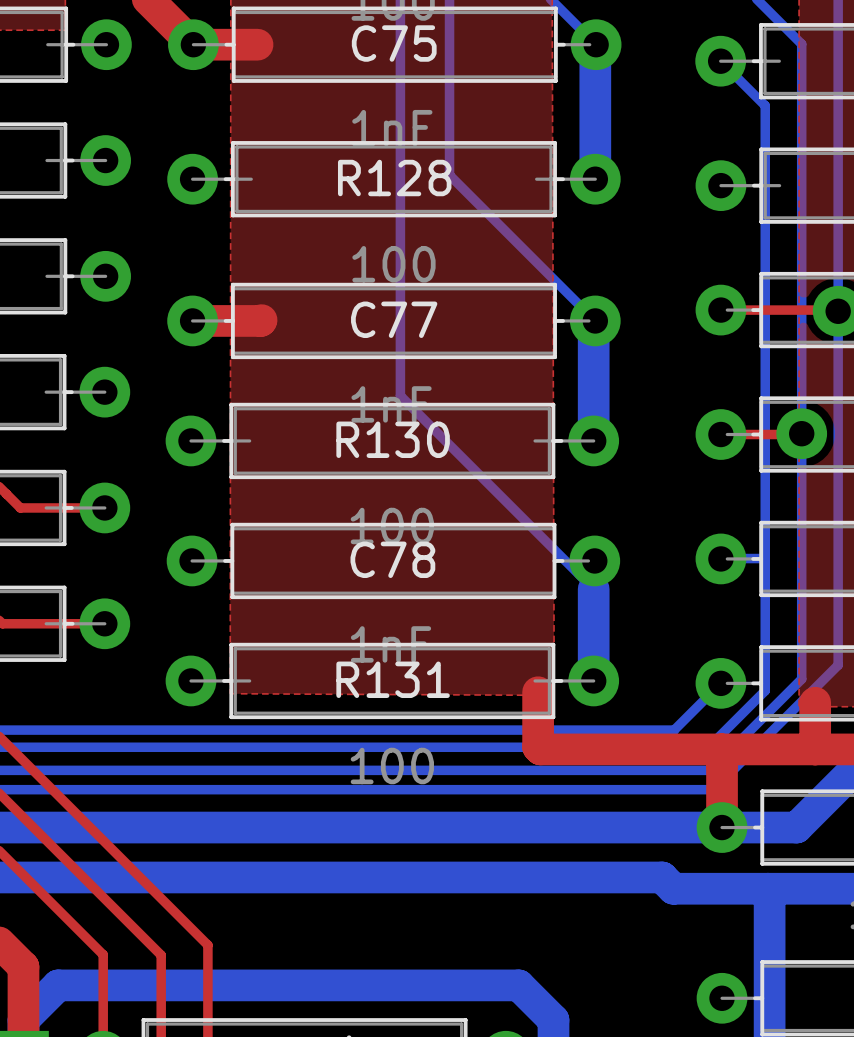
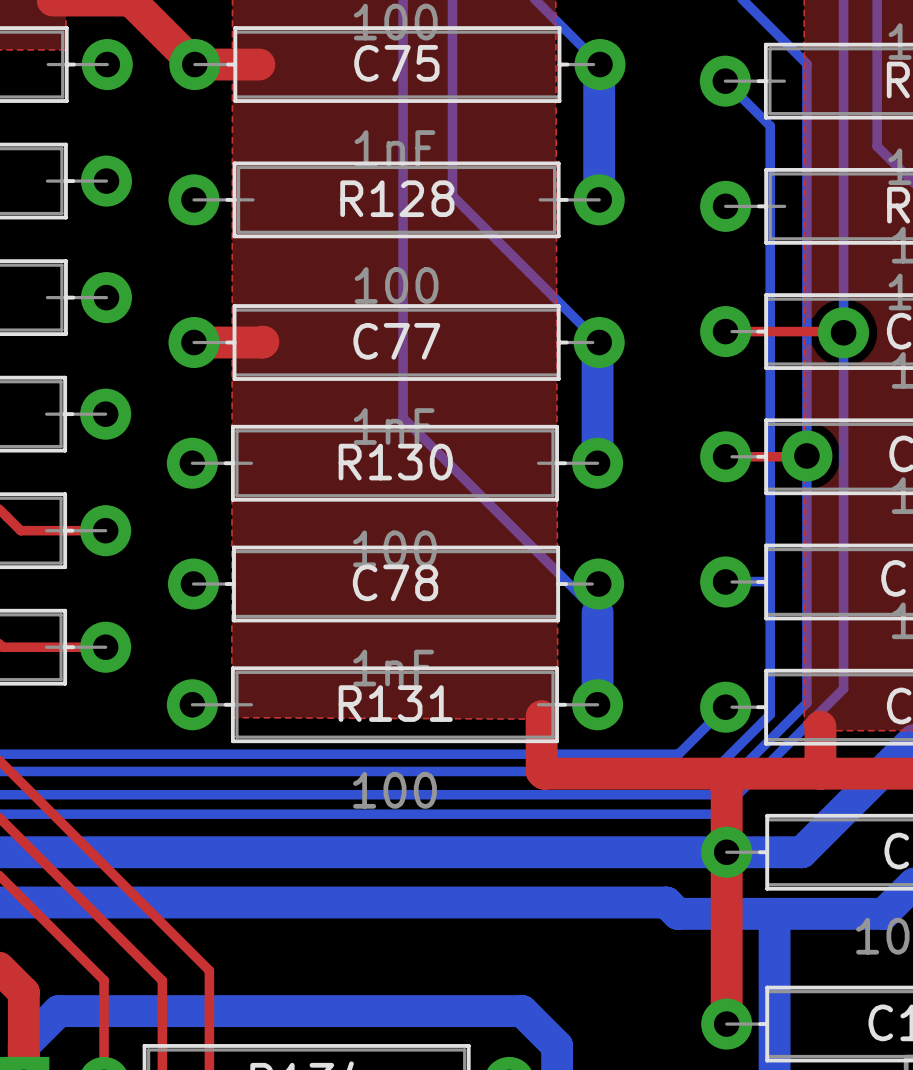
top track: none -> (726, 852) (726, 1024)

